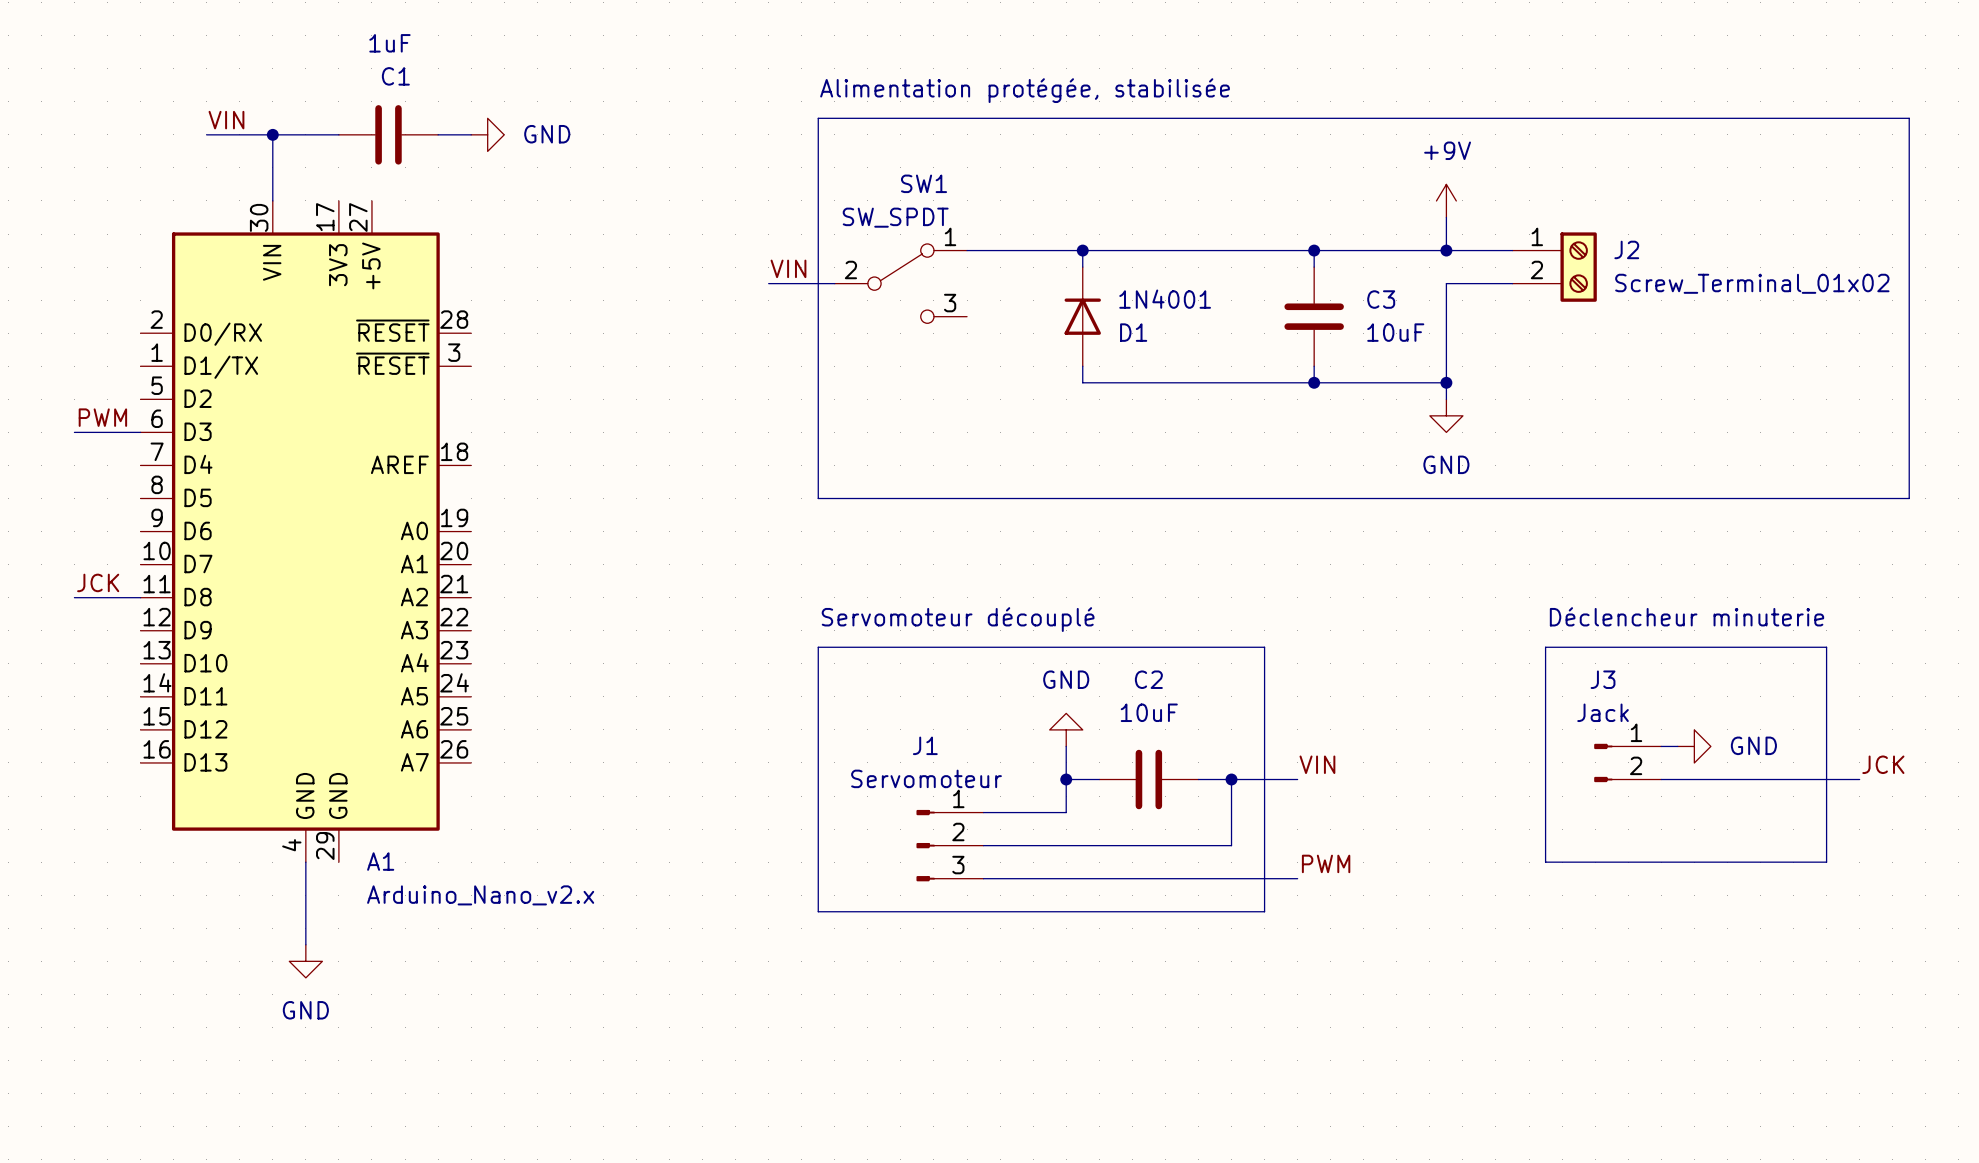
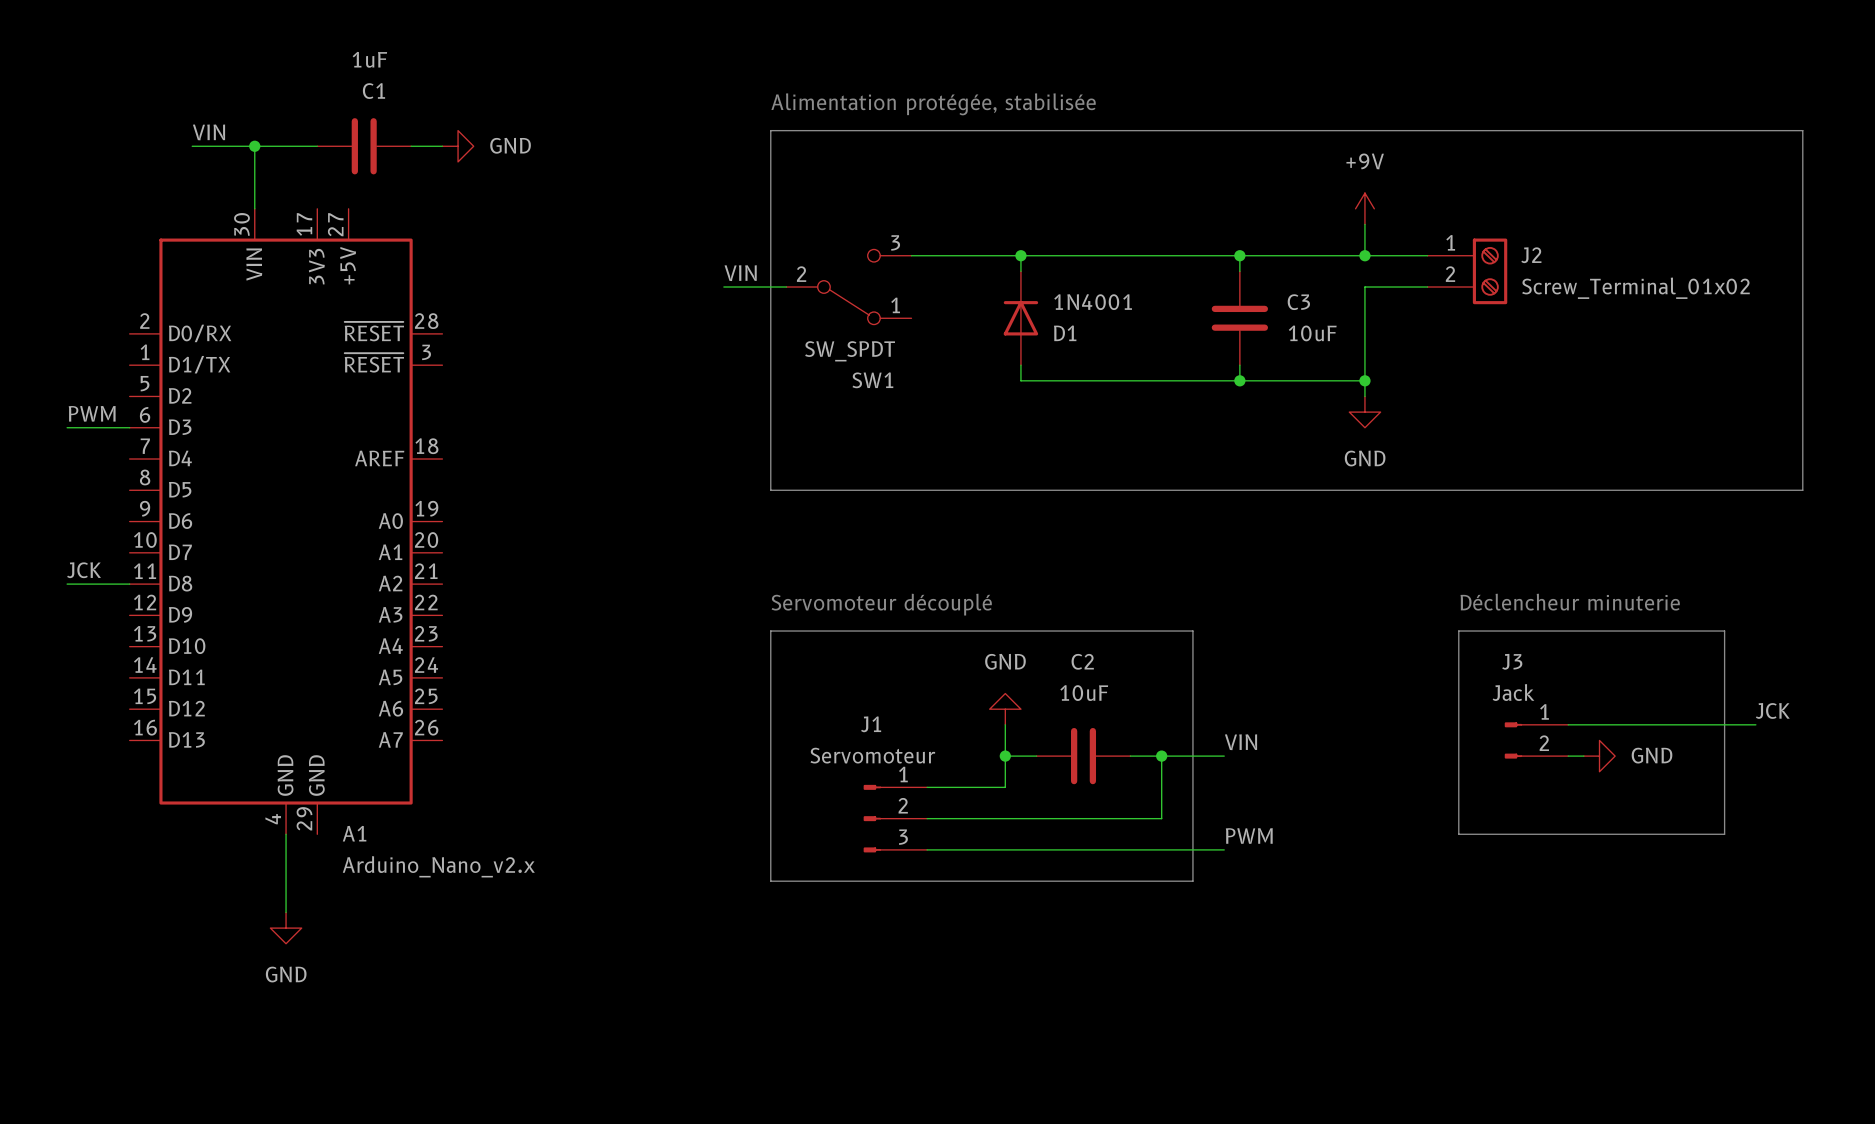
SW1 flip: as is (900, 283) -> up-down (848, 287)
power symbol position: GND (1694, 746) -> GND (1599, 756)
label position: JCK (1883, 764) -> JCK (1772, 710)
wire: (1677, 779) (1859, 779) -> (1583, 724) (1755, 724)

